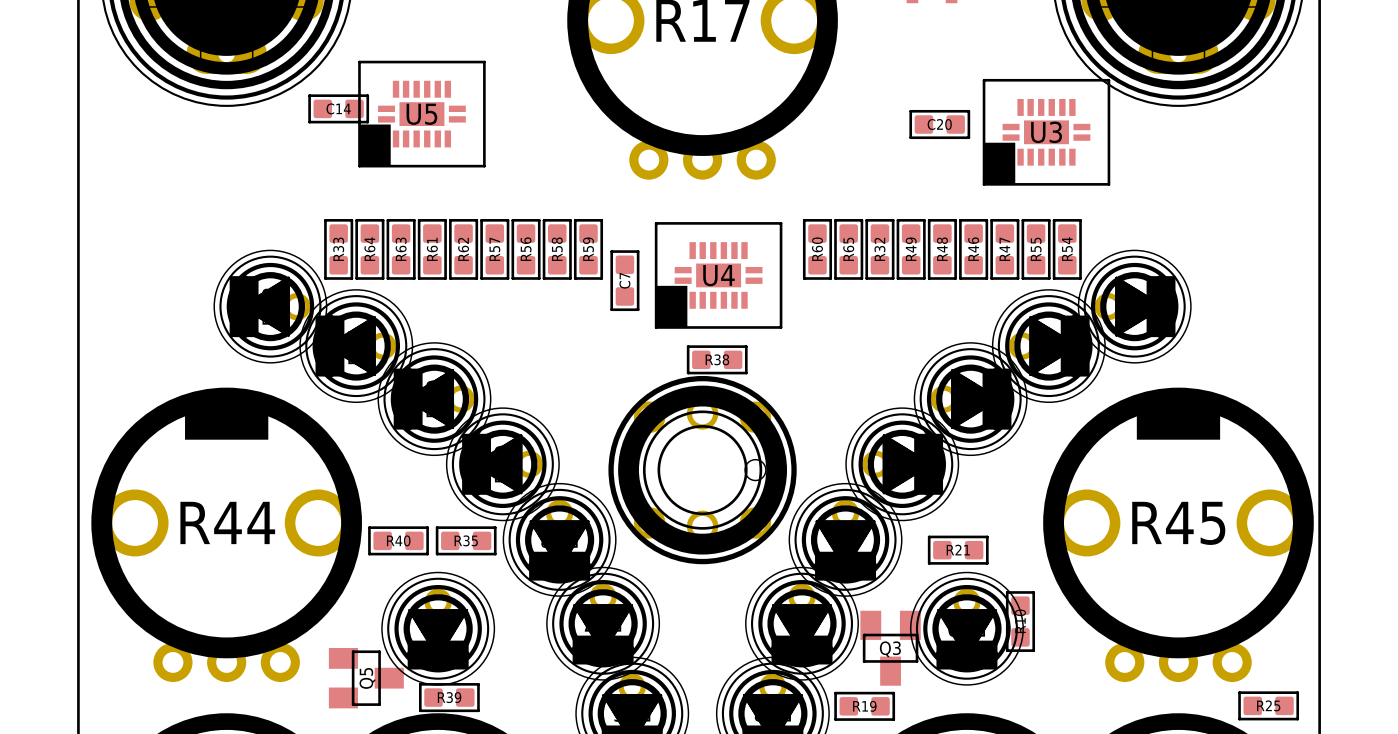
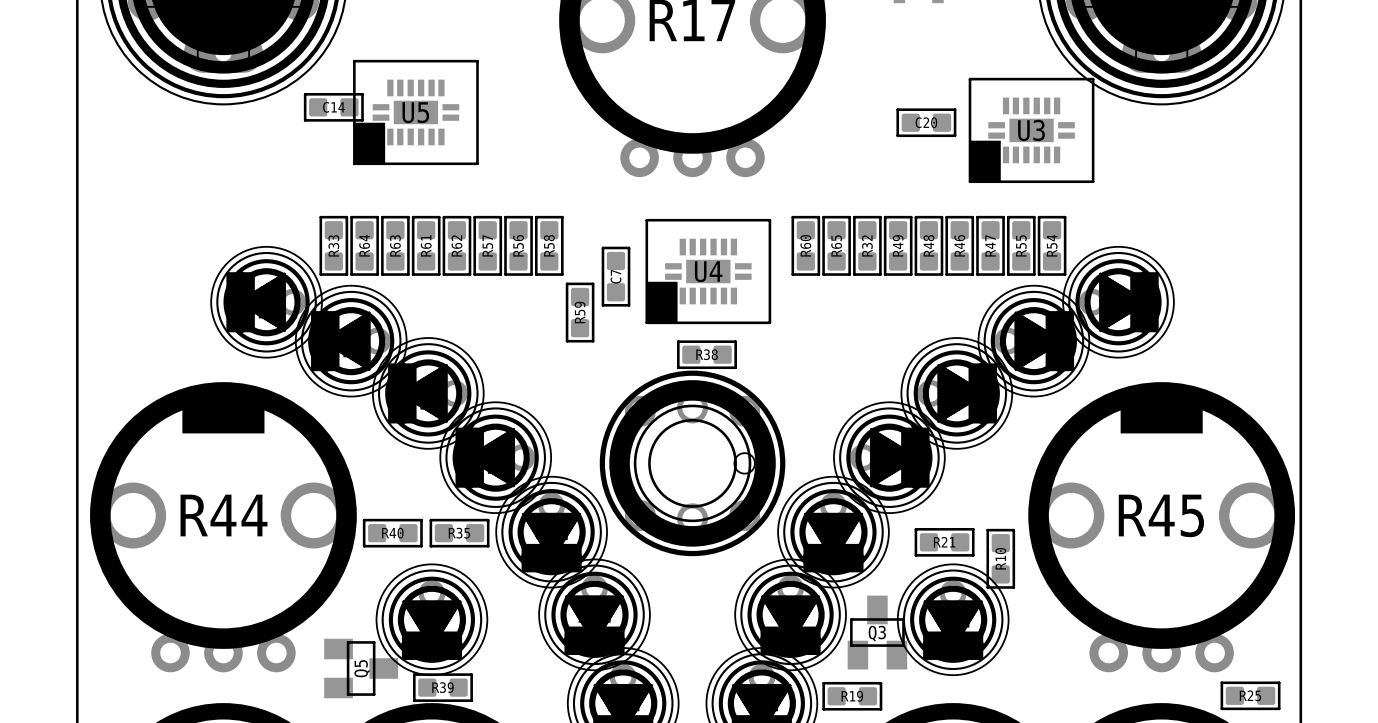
R59 position: (588, 249) -> (580, 312)
R10 position: (1020, 621) -> (1000, 558)
Q3 rotation: 0° (890, 648) -> 180° (877, 632)

